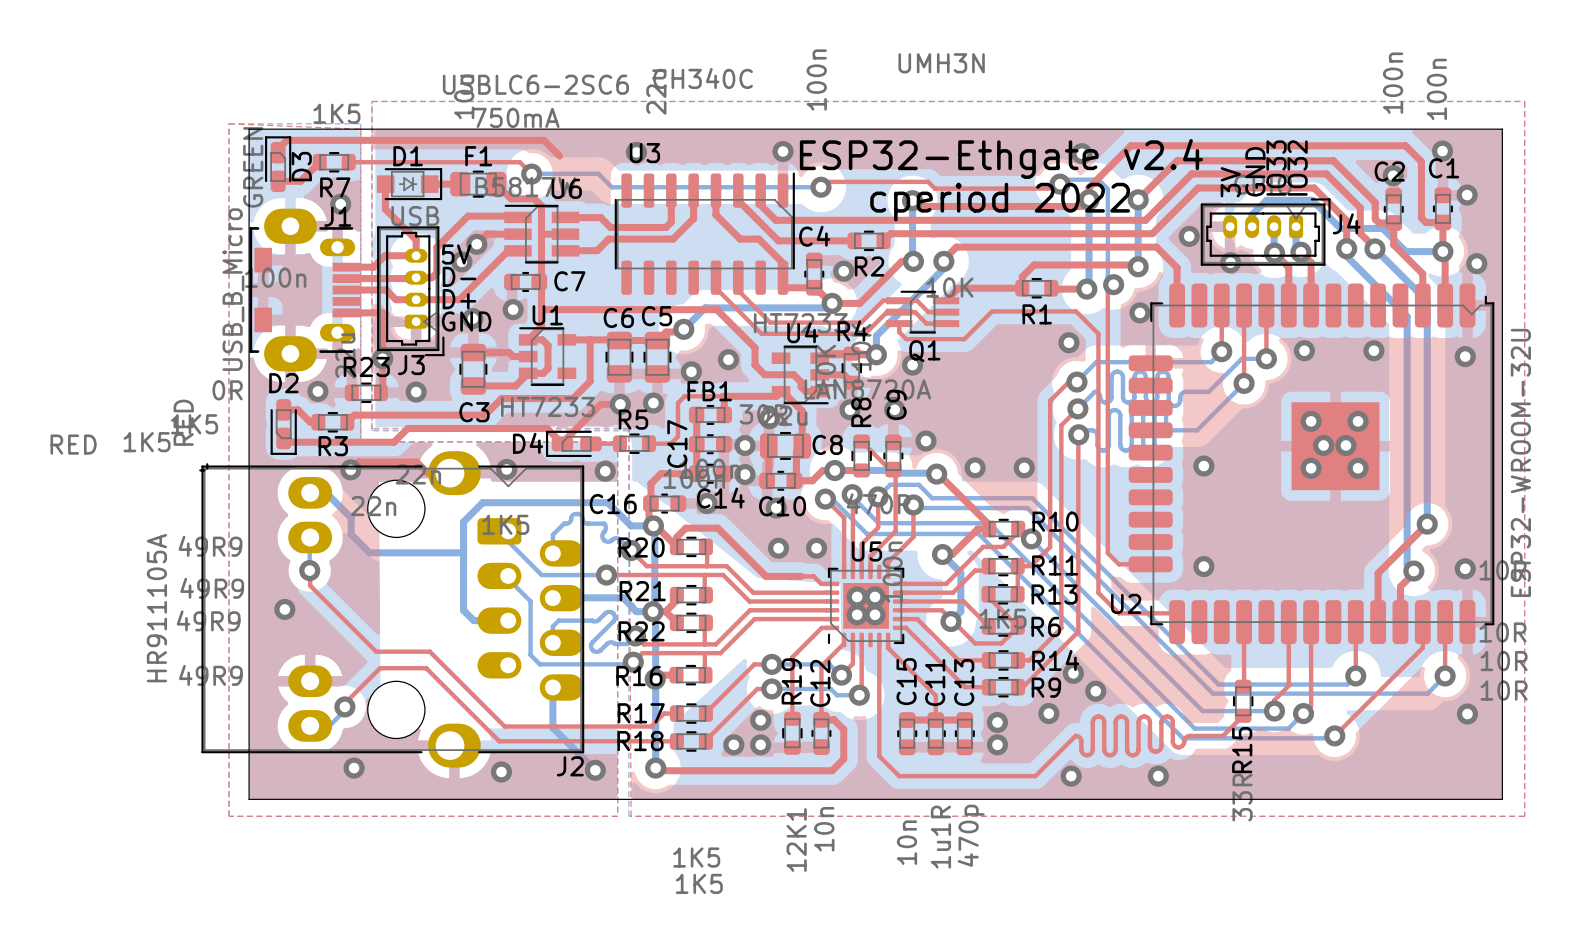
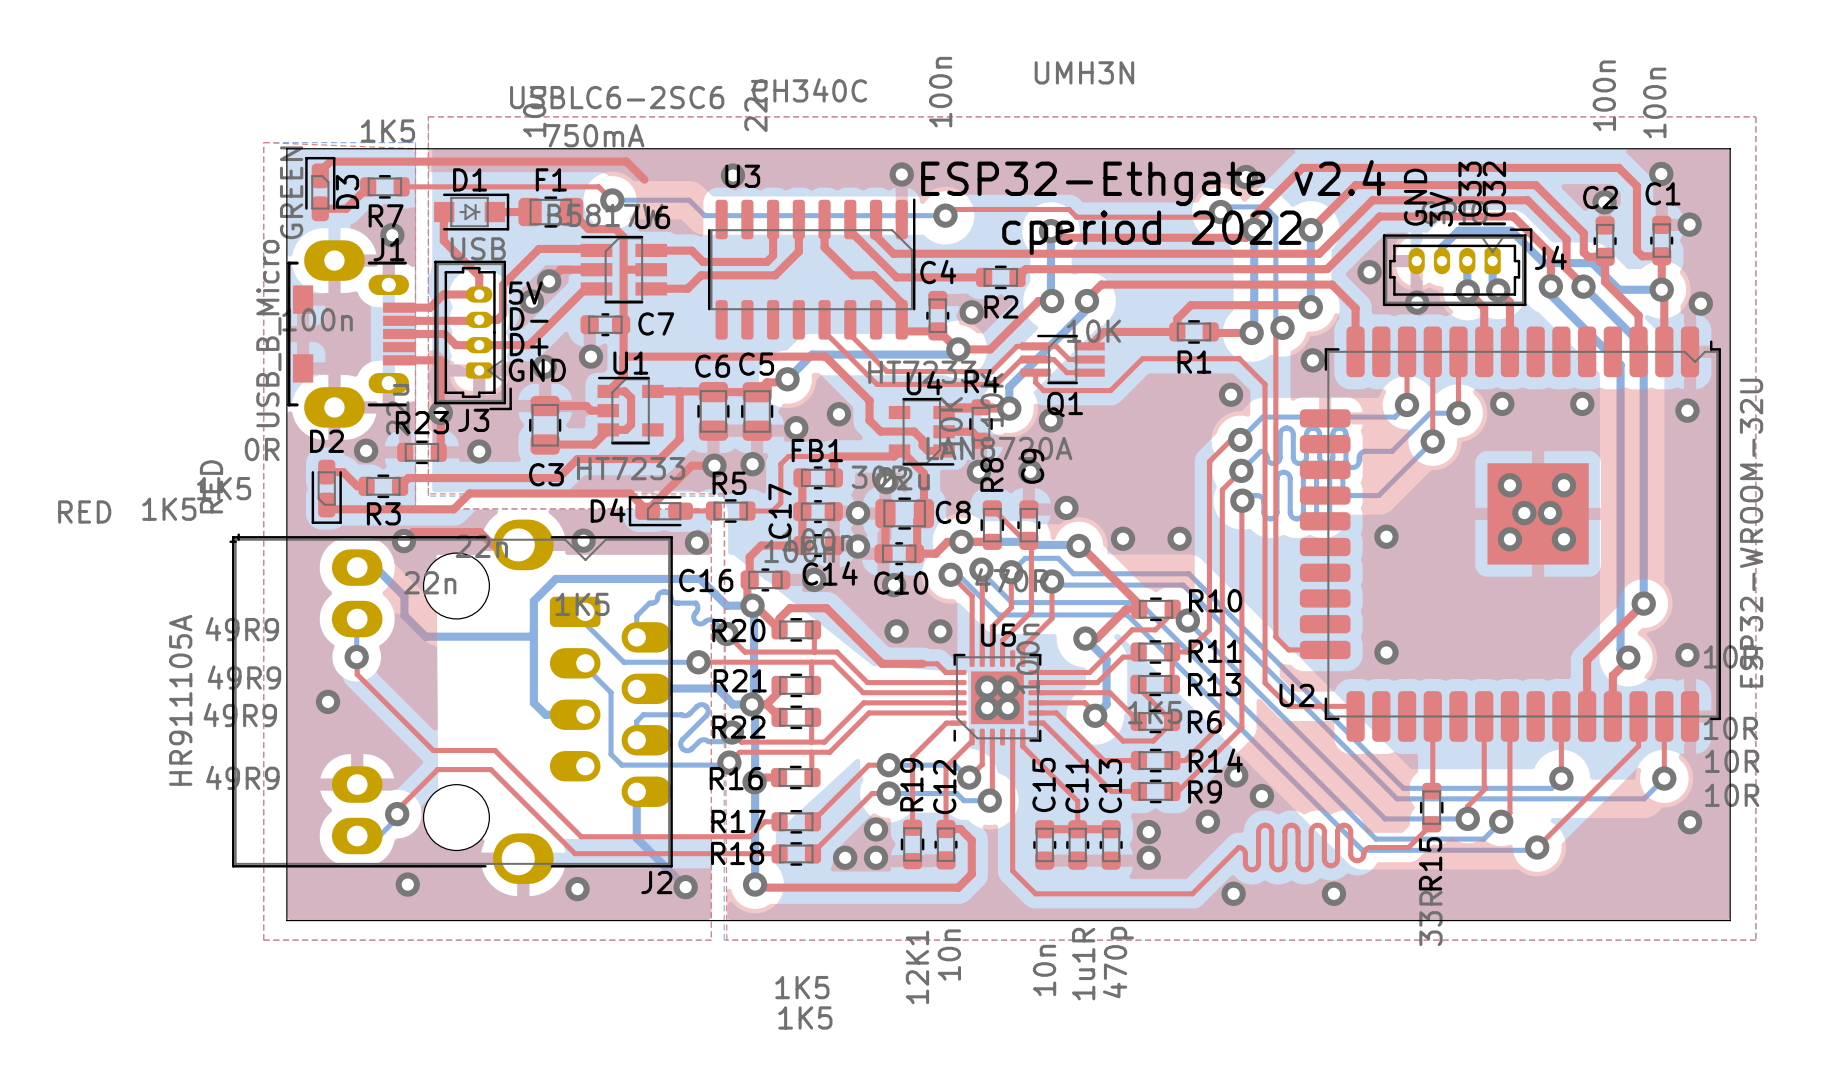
text: GND (1255, 171) -> 3V (1441, 209)
text: 3V (1230, 182) -> GND (1415, 197)

